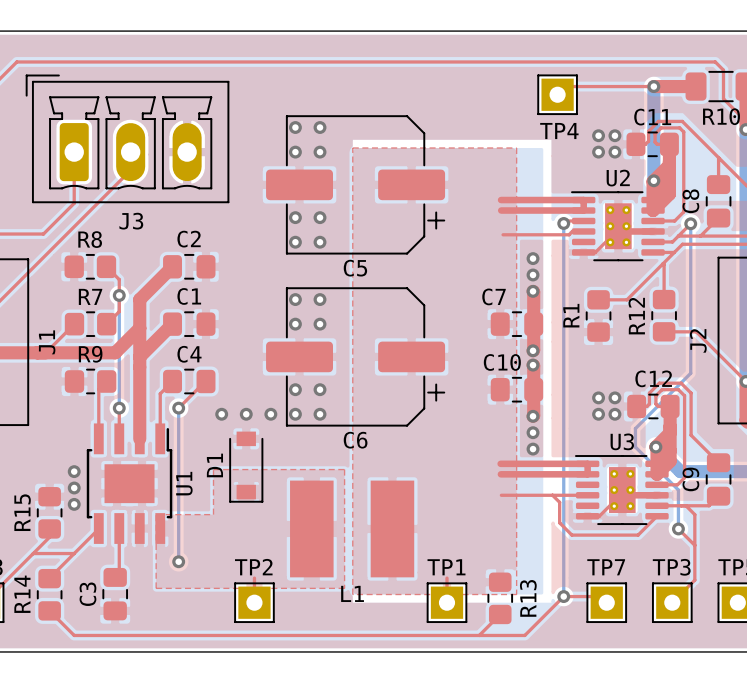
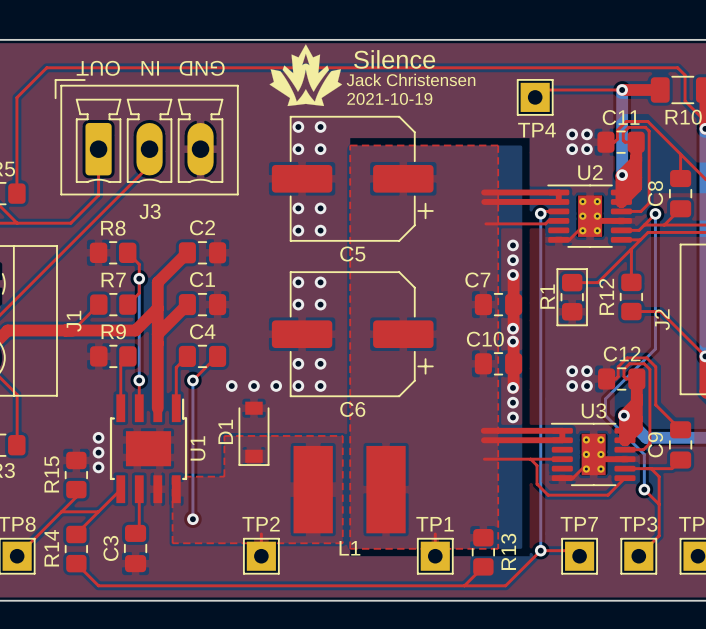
drawing: none -> [269, 44, 343, 107]
text: none -> Silence (394, 59)
text: none -> OUT (98, 68)
text: none -> IN (150, 68)
text: none -> GND (202, 68)
text: none -> Jack Christensen (411, 79)
text: none -> 2021-10-19 (389, 98)
line: none -> (557, 269) (557, 325) (587, 325) (587, 269) (557, 269)

